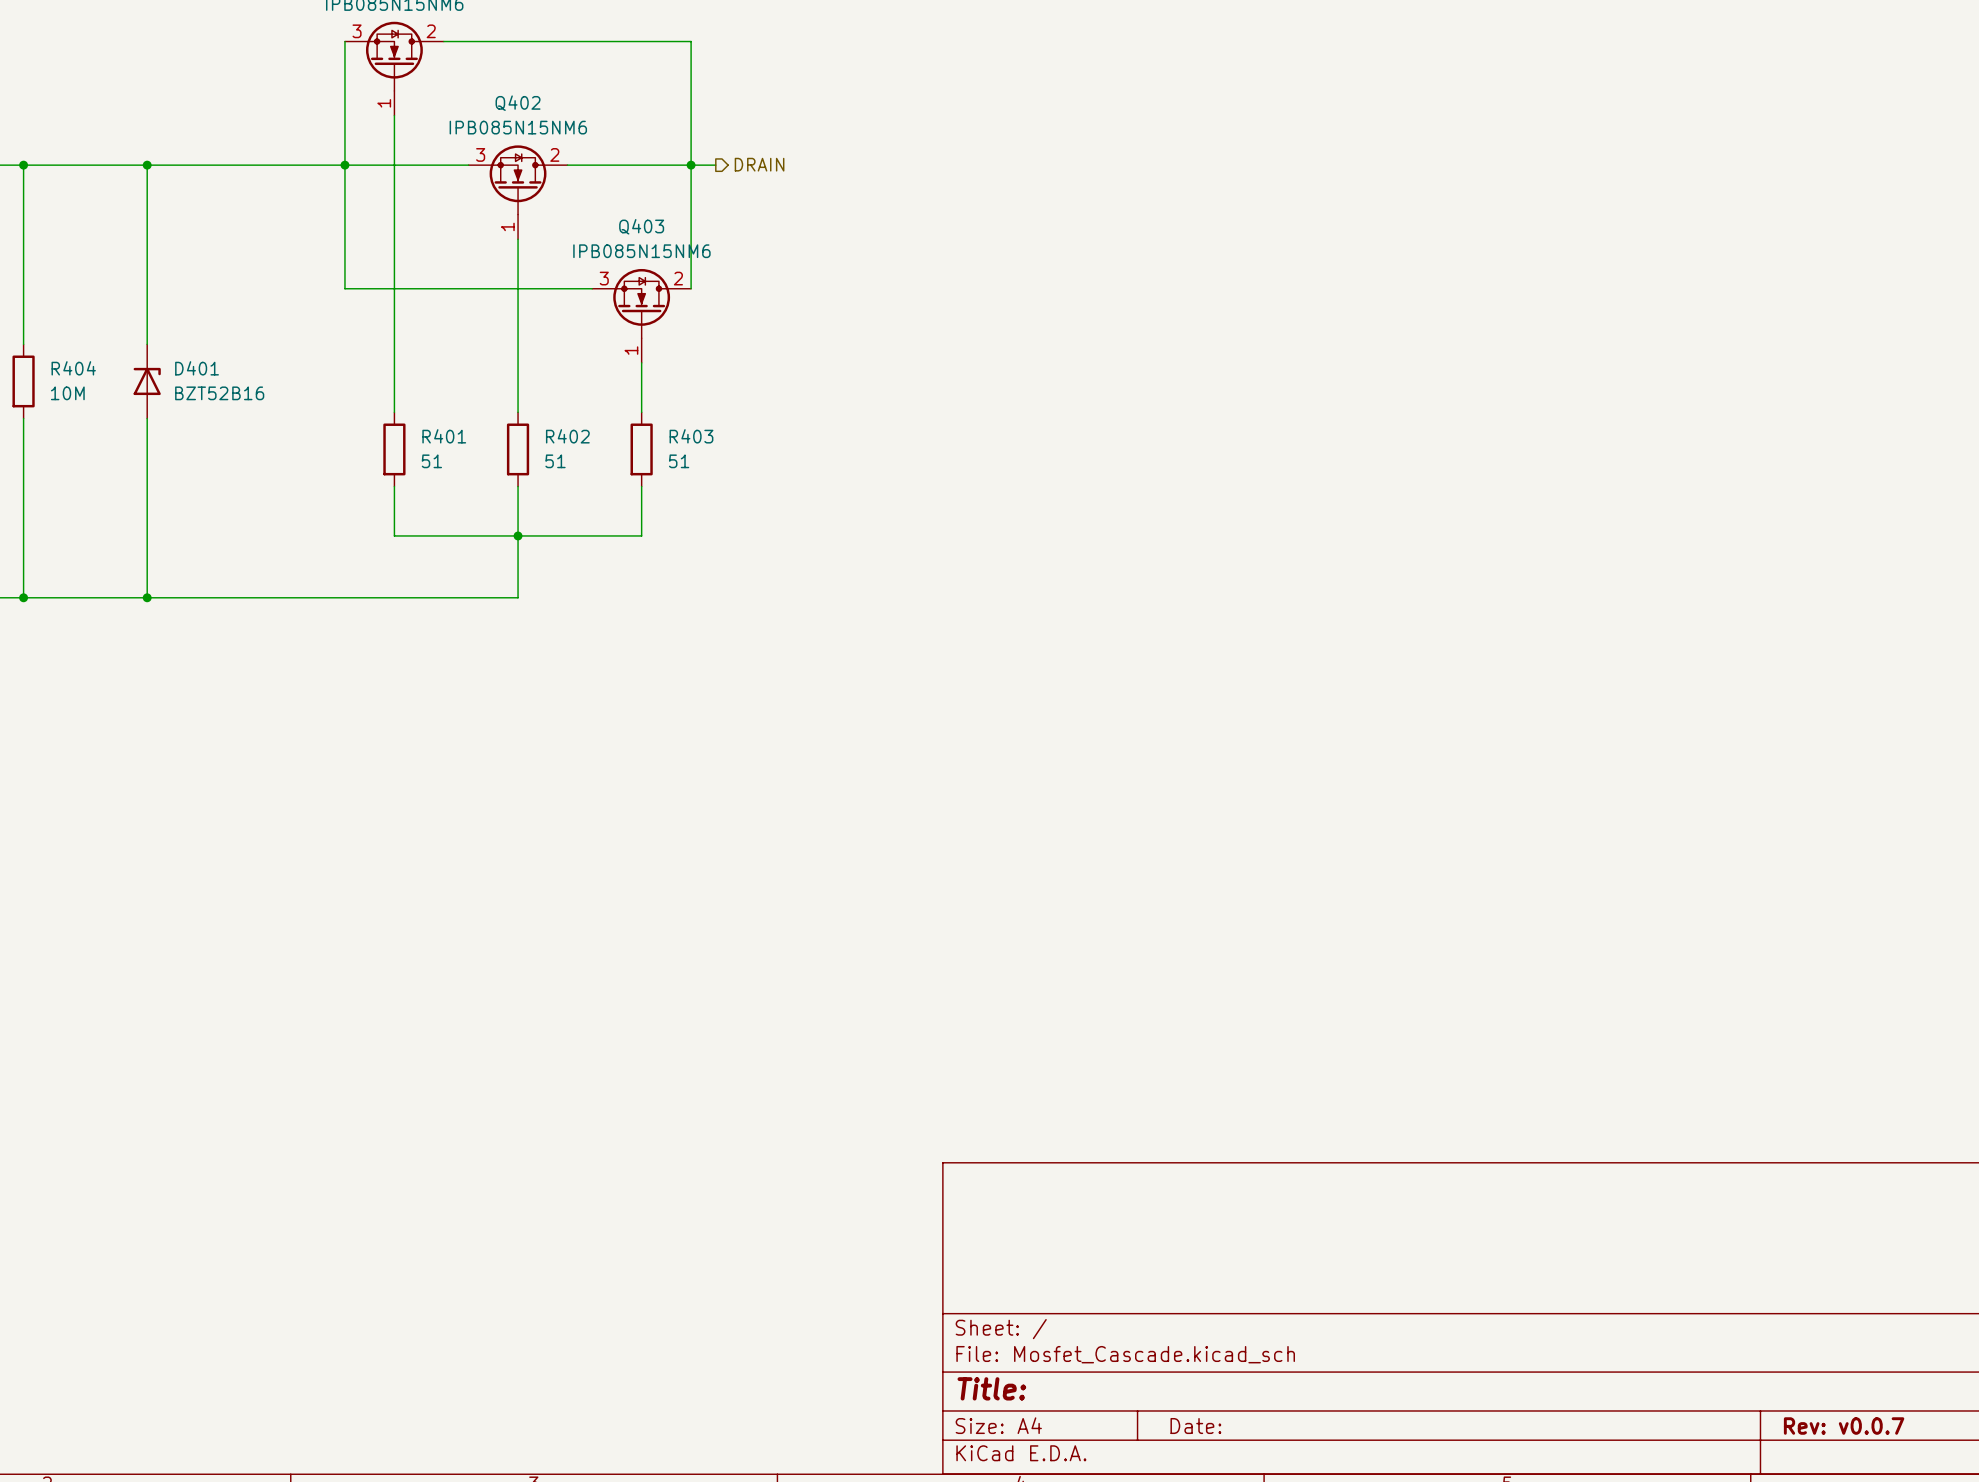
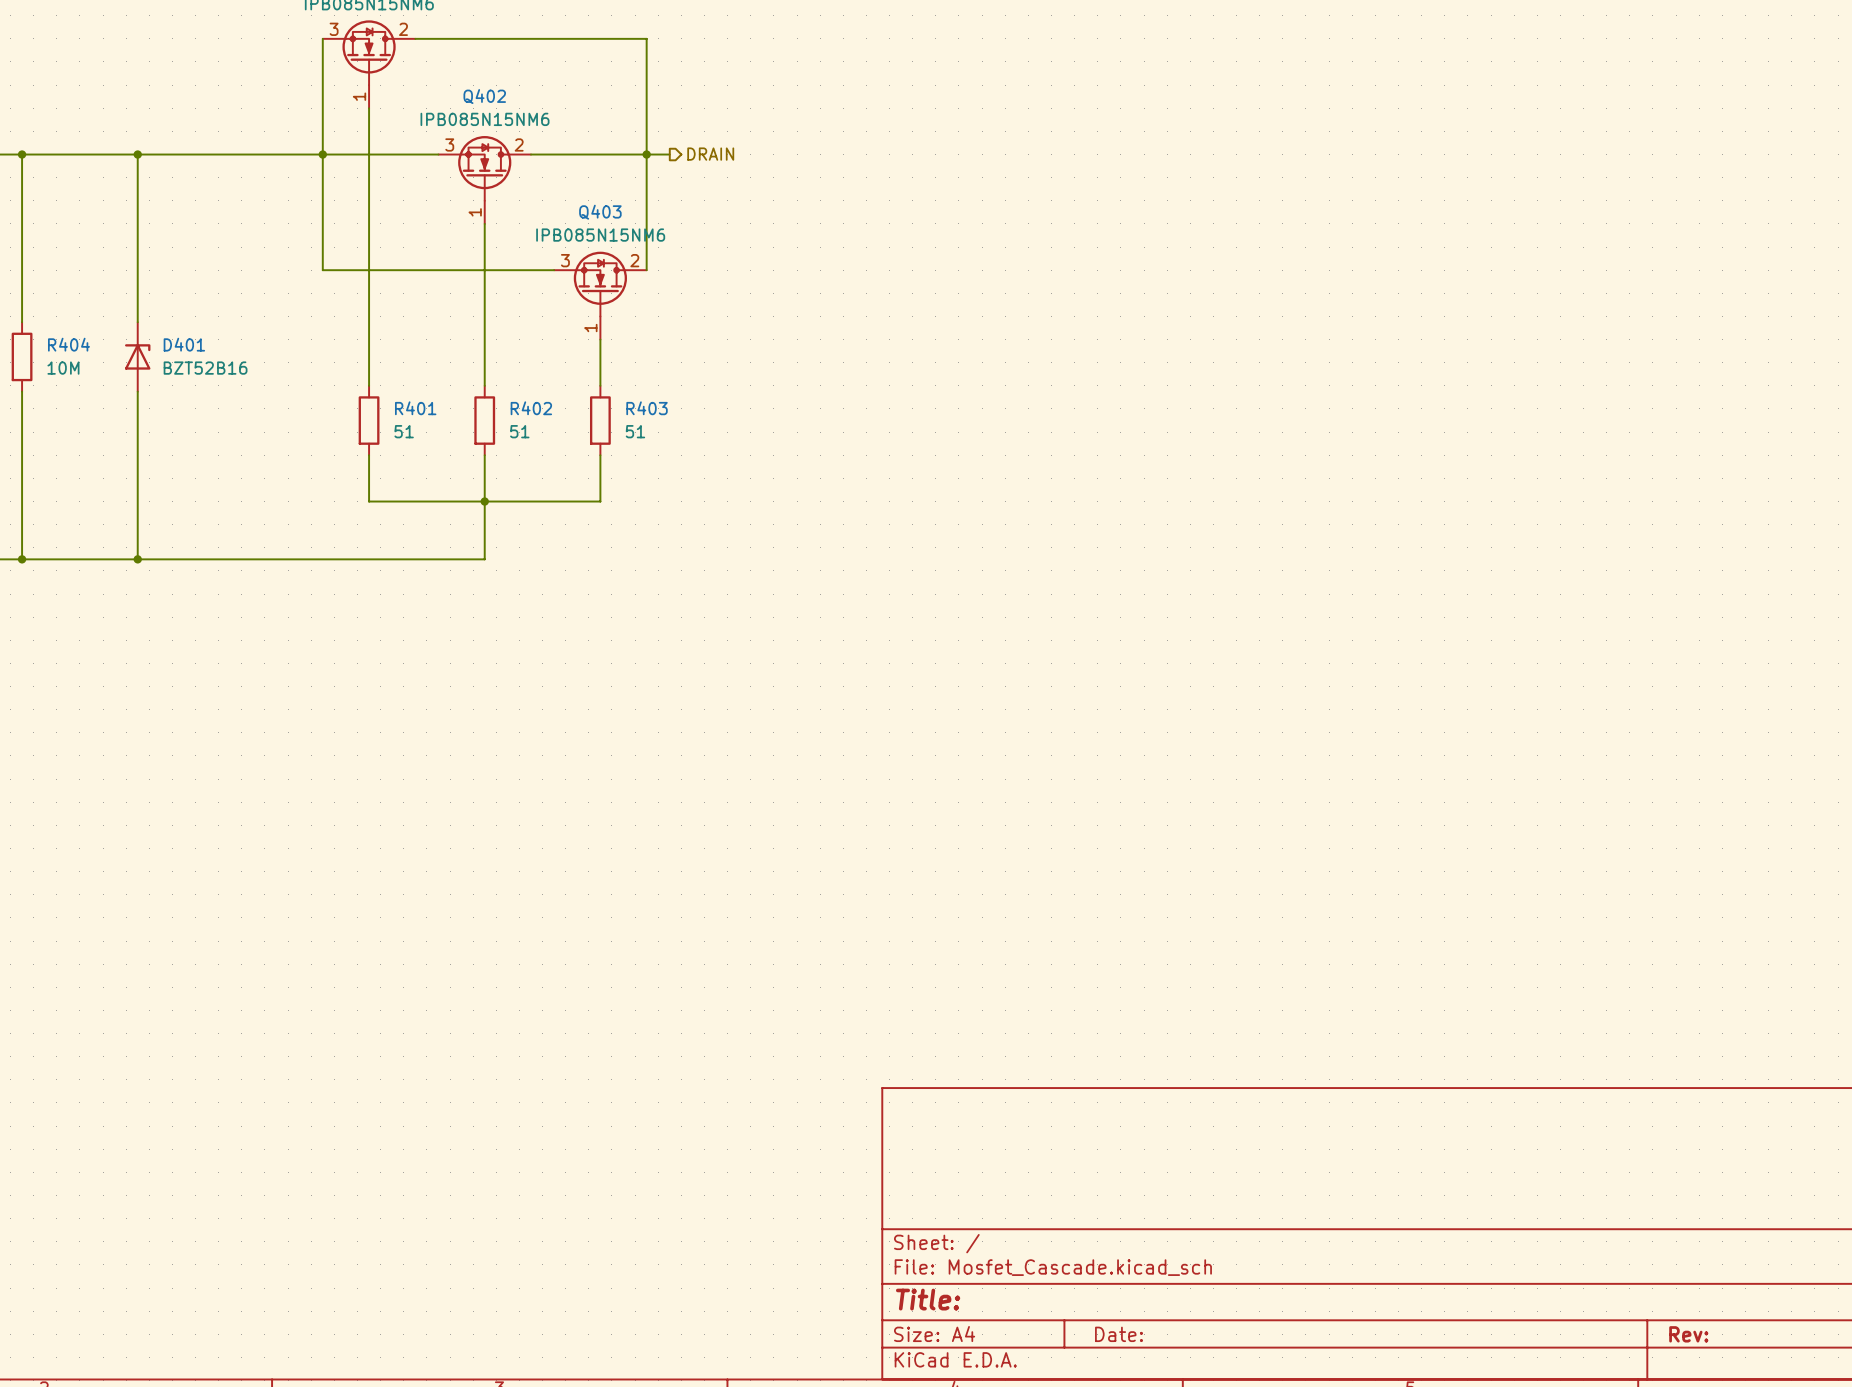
title block: Rev: v0.0.7 (1844, 1426) -> Rev: (1688, 1334)

